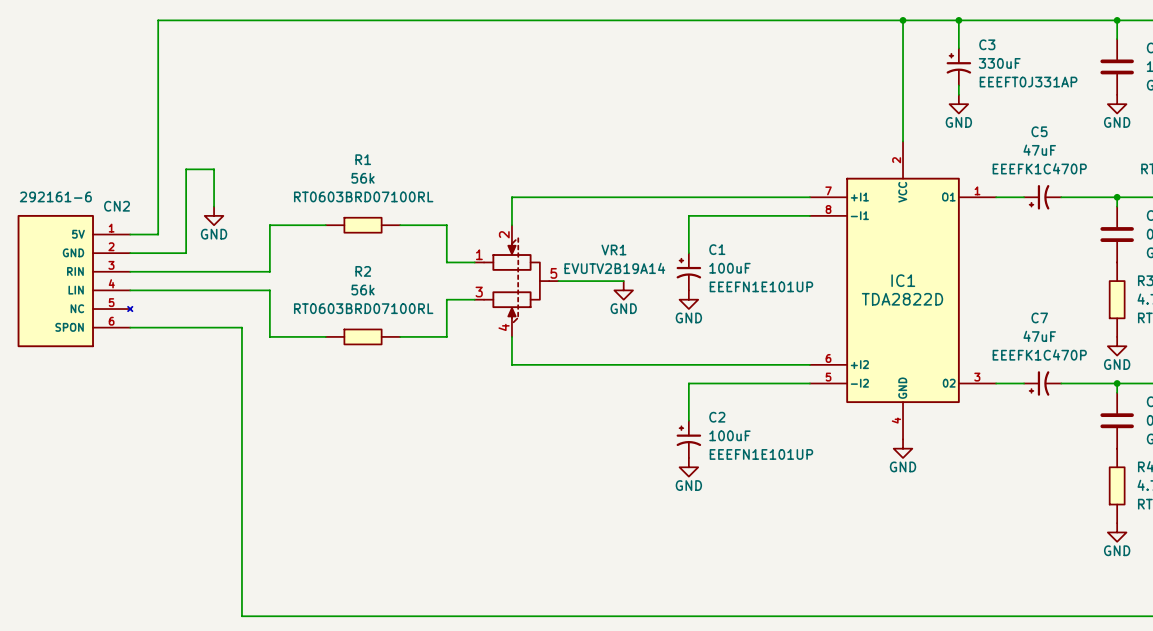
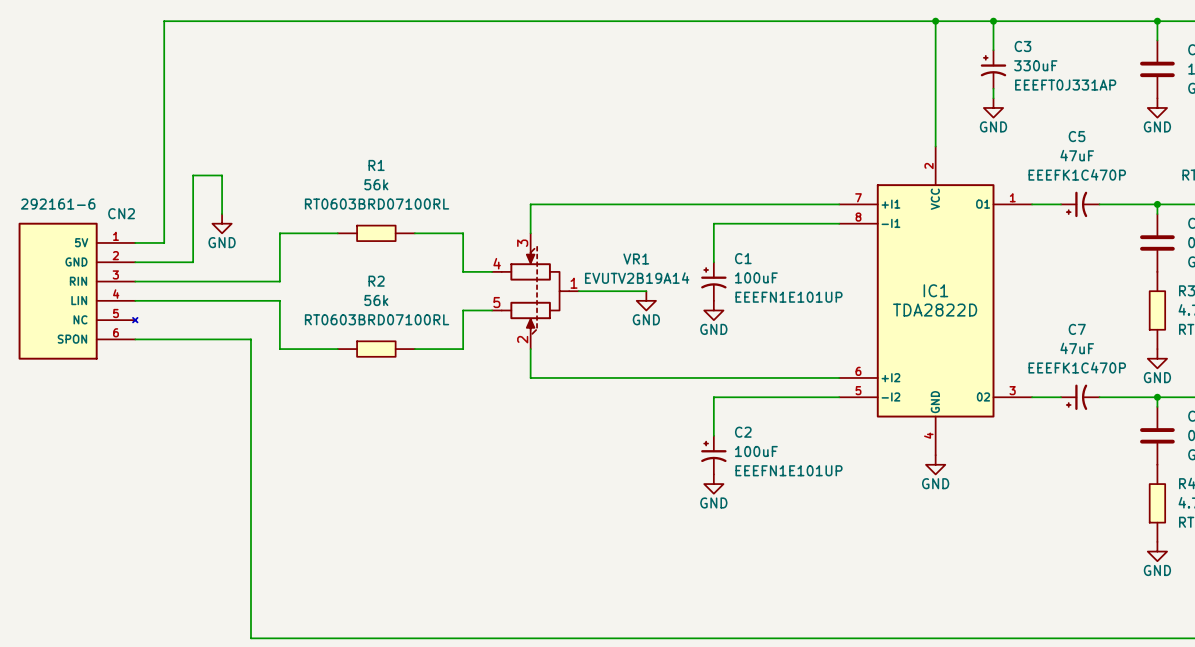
VR1 pin number: 2 (504, 234) -> 3 (522, 243)
VR1 pin number: 1 (479, 254) -> 4 (497, 263)
VR1 pin number: 5 (553, 273) -> 1 (574, 283)
VR1 pin number: 3 (479, 292) -> 5 (496, 302)
VR1 pin number: 4 (504, 327) -> 2 (522, 339)

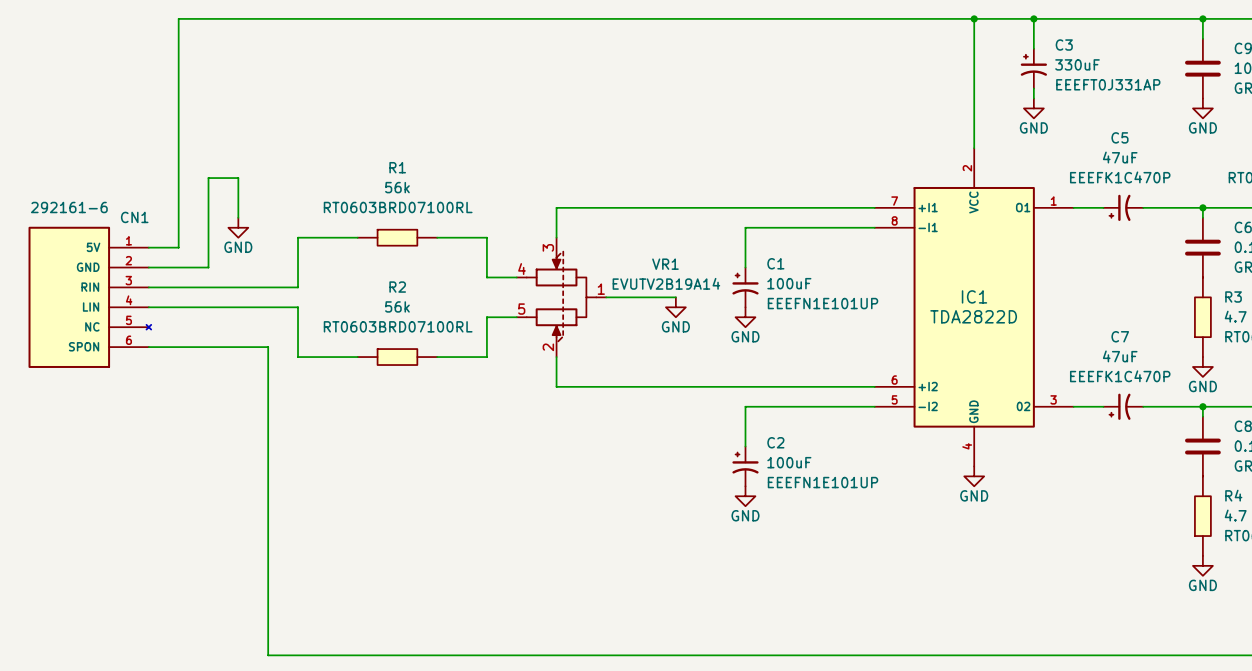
CN2 name: CN2 (121, 213) -> CN1 (134, 217)

